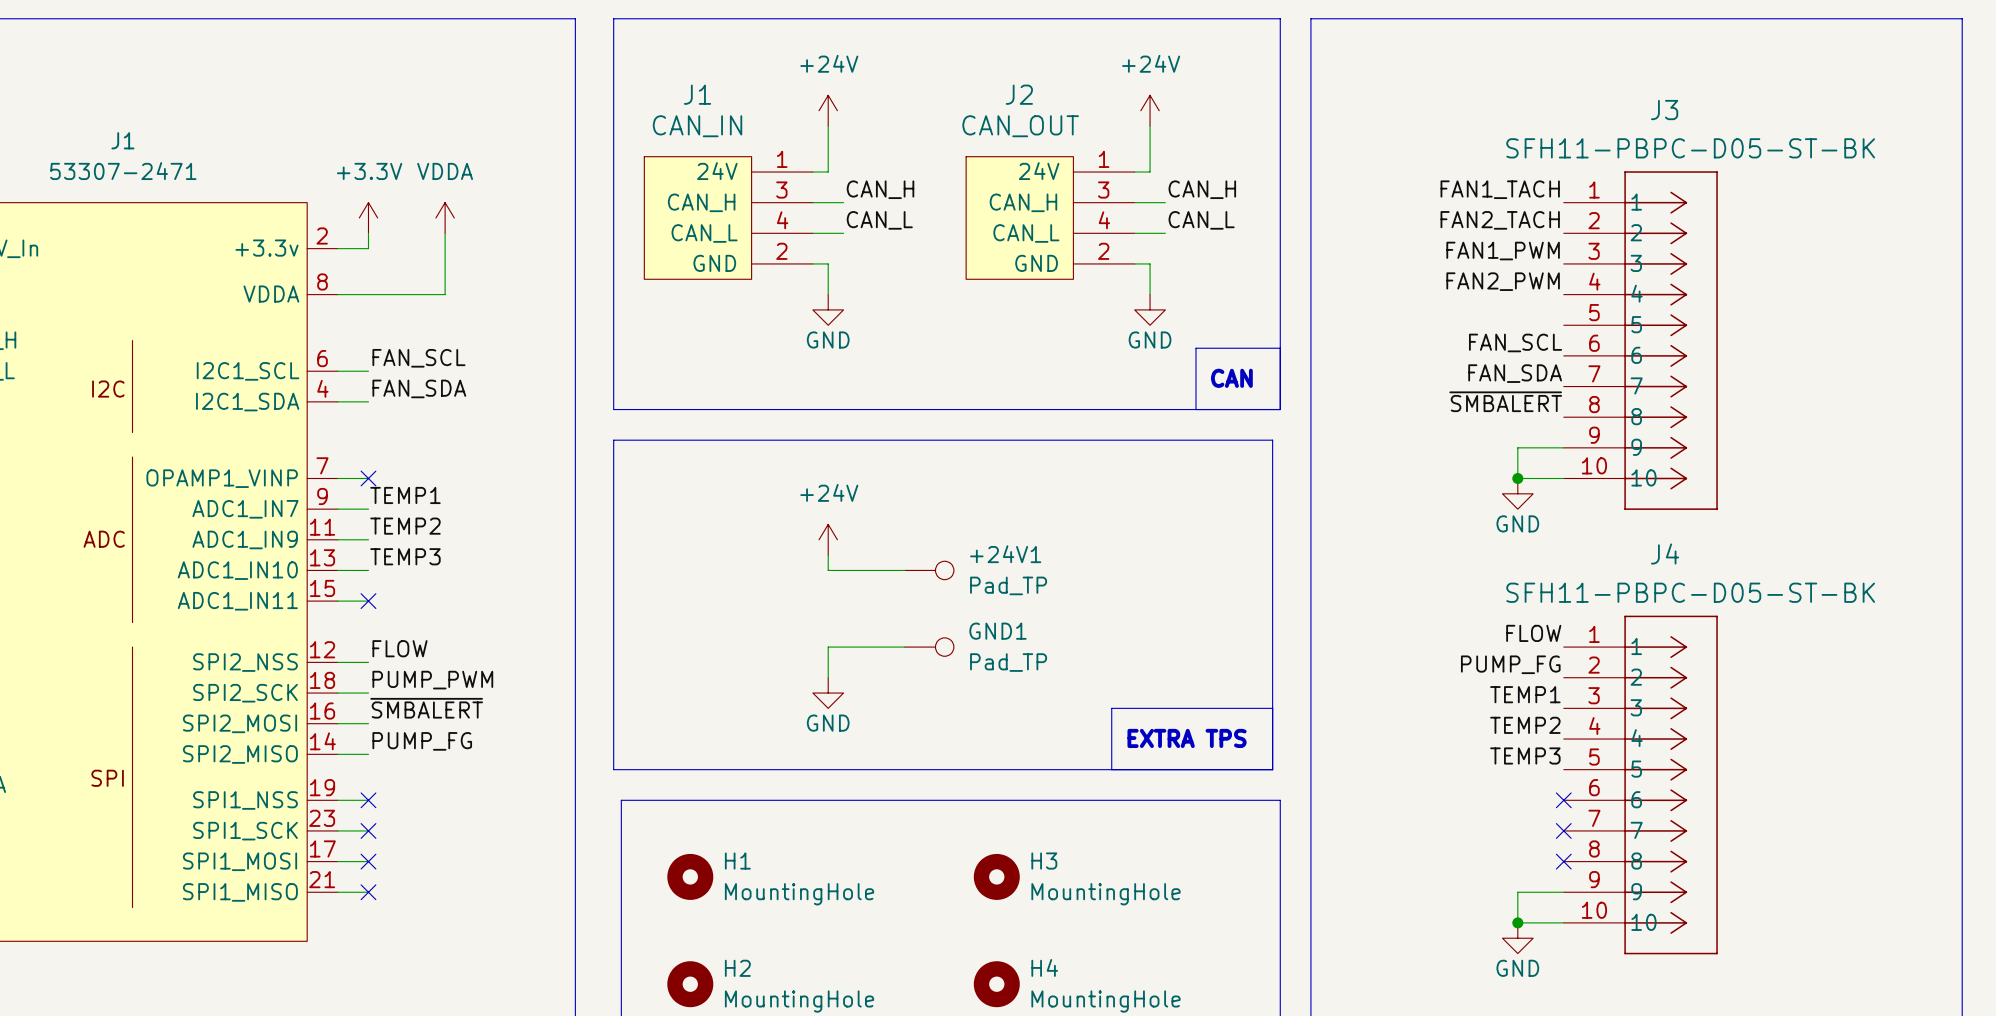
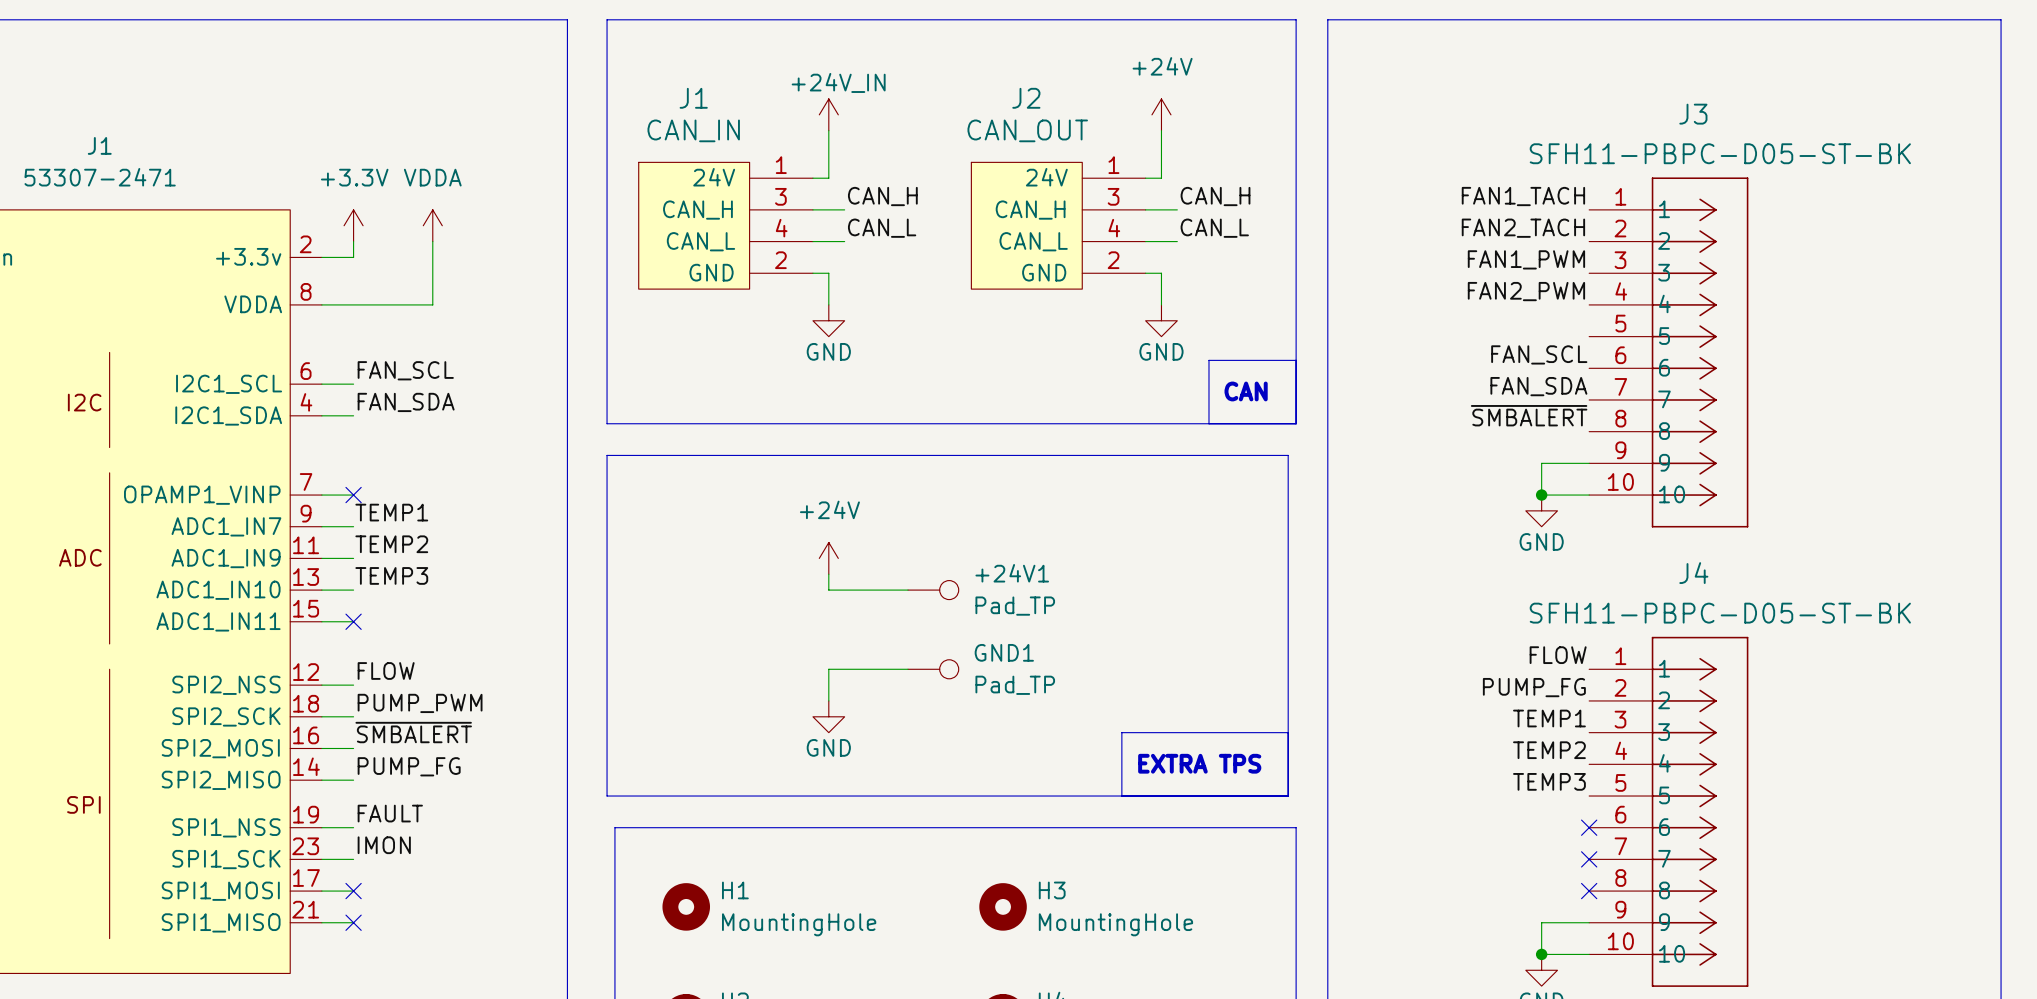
power symbol: +24V (828, 110) -> +24V_IN (828, 114)
label: none -> FAULT (390, 813)
no-connect mark: (368, 800) -> none
label: none -> IMON (384, 845)
no-connect mark: (368, 830) -> none

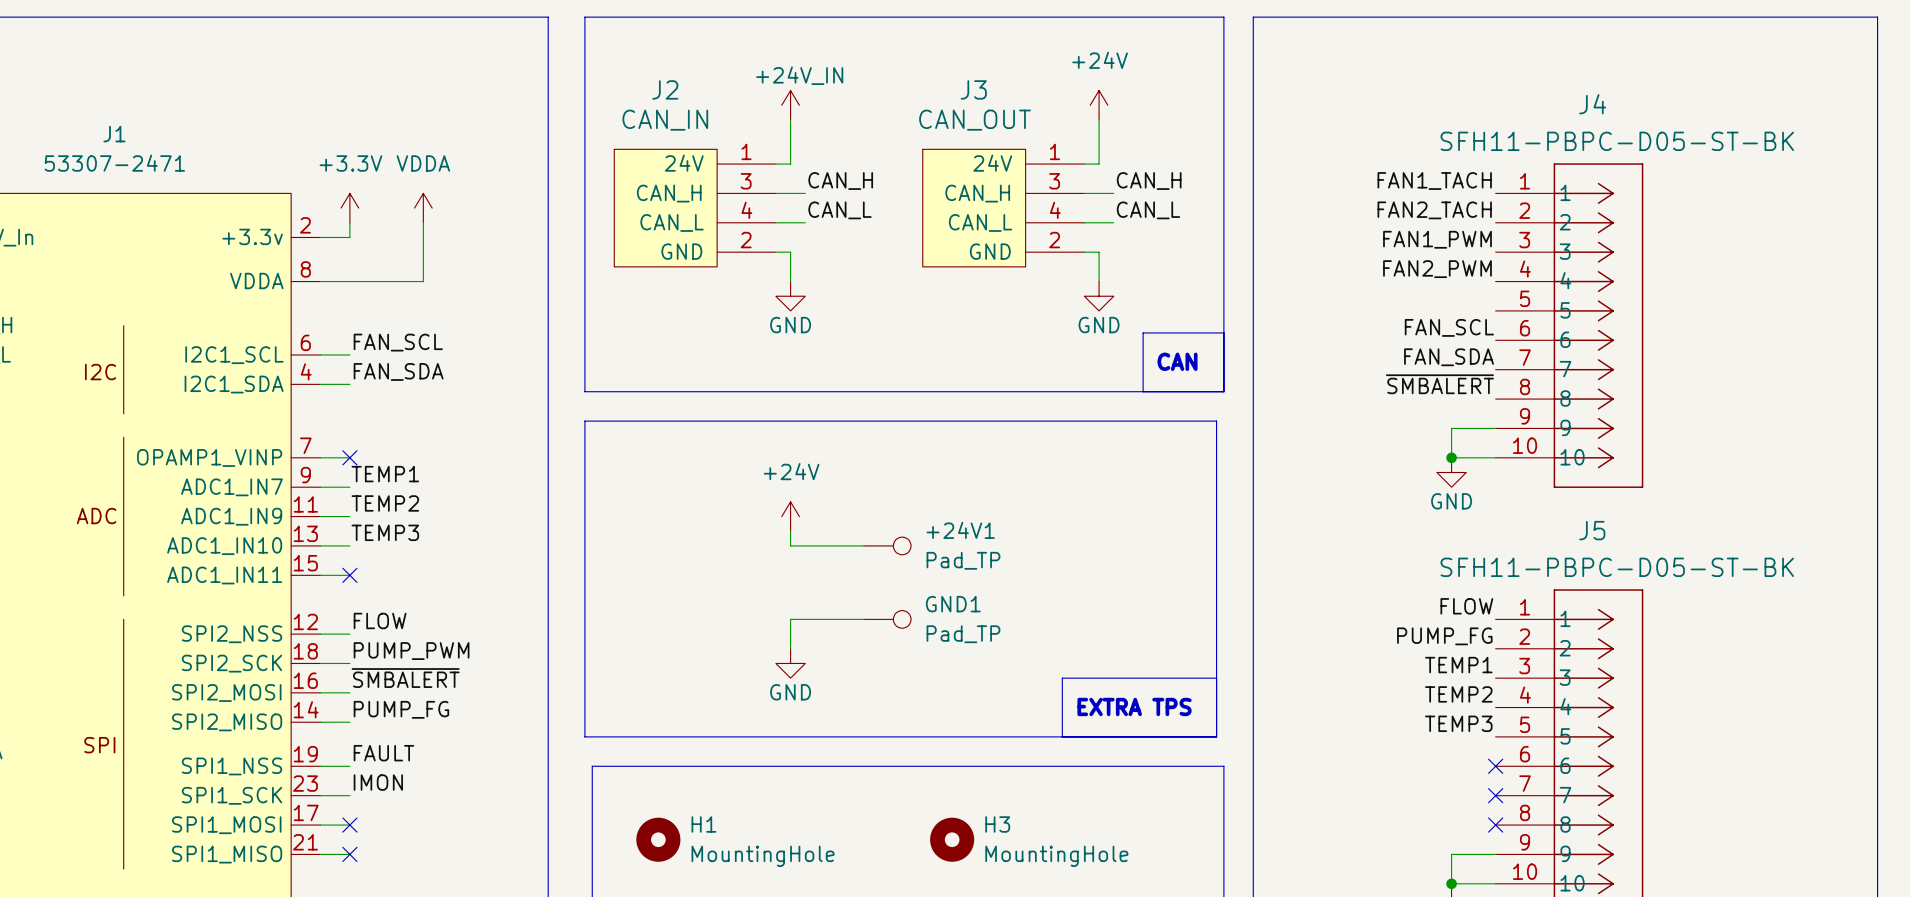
J1 name: J1 (693, 98) -> J2 (665, 89)
J2 name: J2 (1026, 98) -> J3 (973, 89)
J3 name: J3 (1693, 114) -> J4 (1592, 104)
J4 name: J4 (1693, 573) -> J5 (1592, 530)

